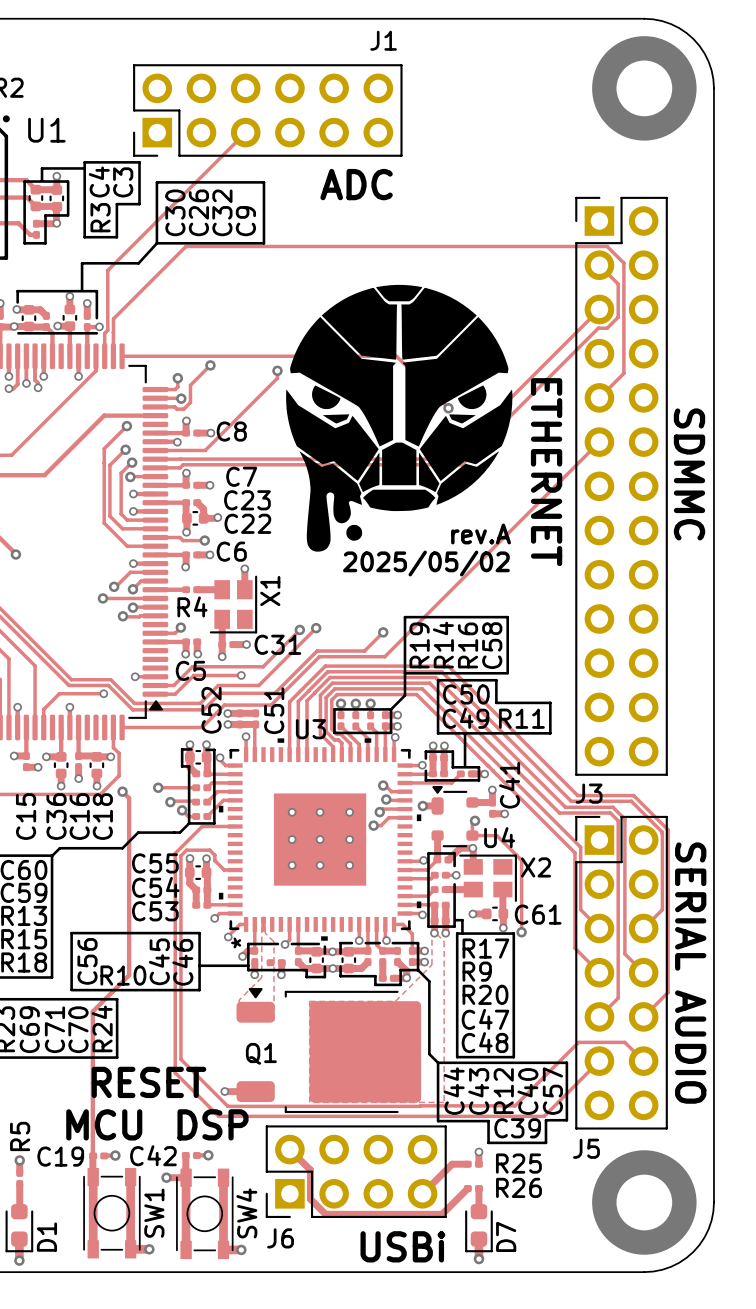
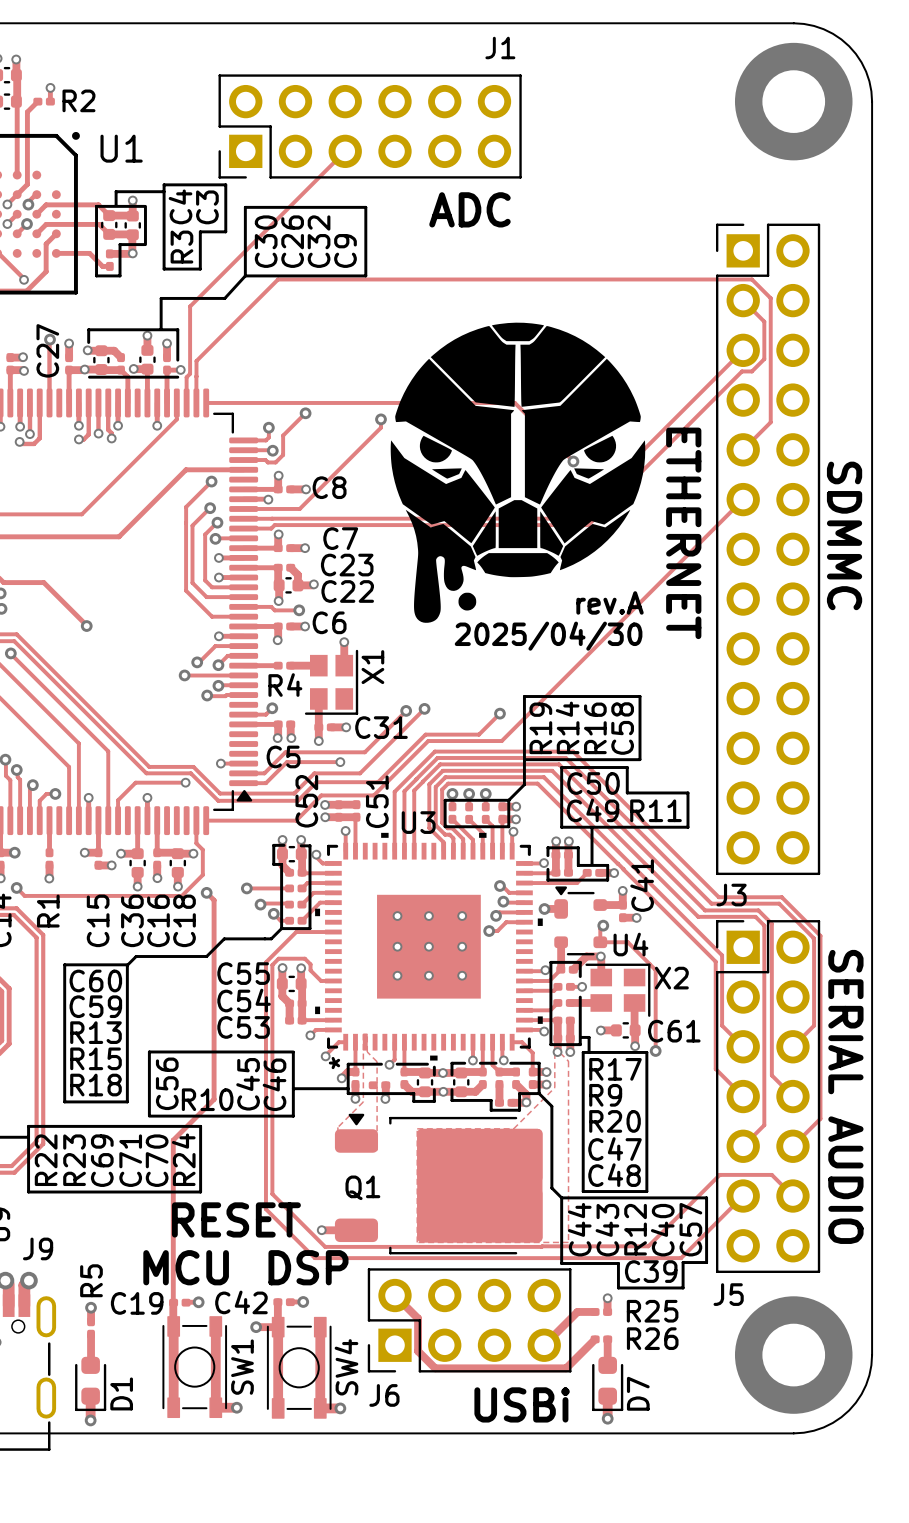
text: 2025/05/02 (426, 563) -> 2025/04/30 (548, 636)

